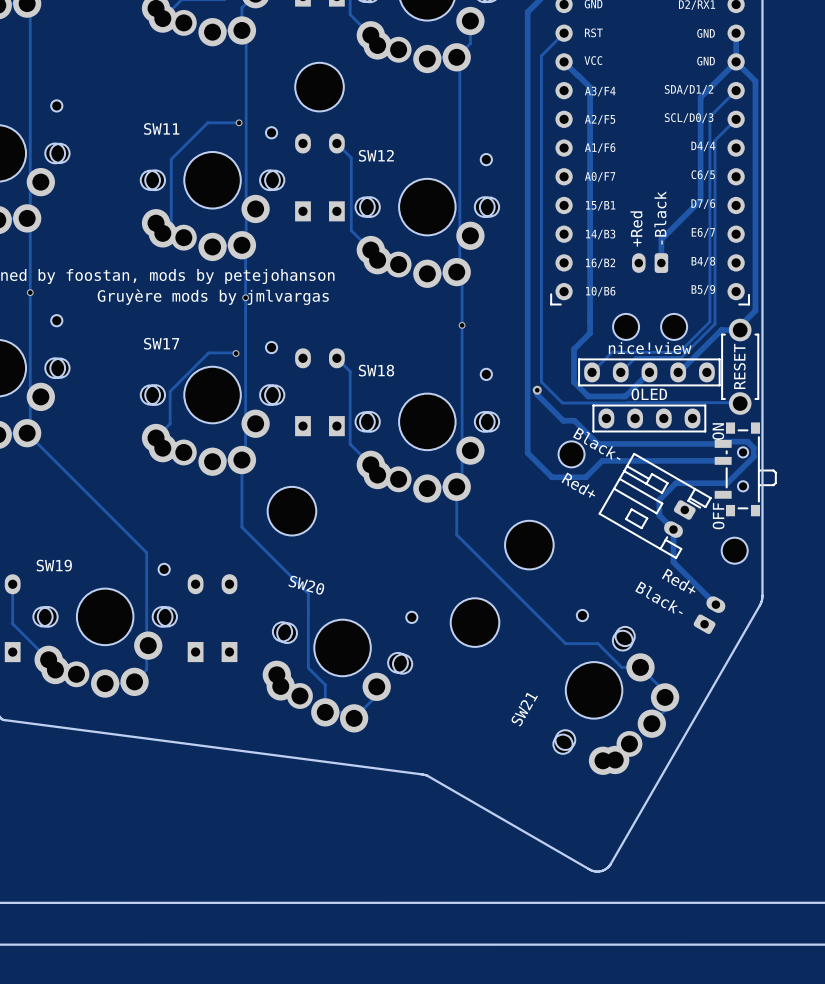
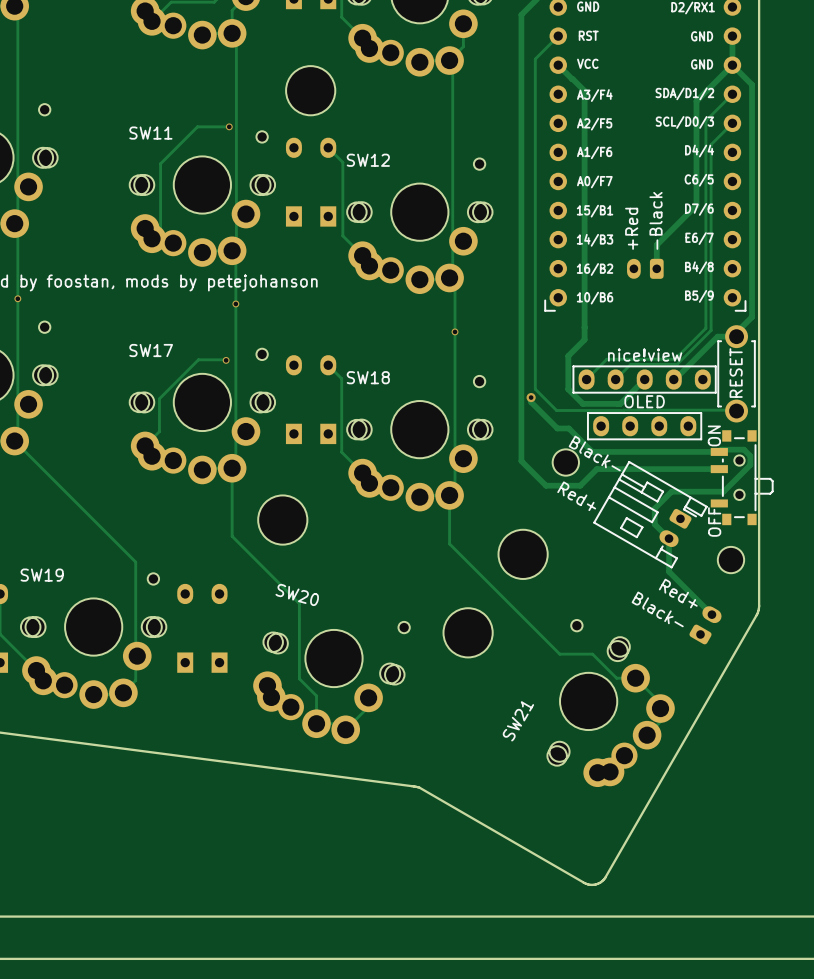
text: Gruyère mods by jmlvargas (213, 297) -> none
part: (626, 326) -> none
part: (674, 326) -> none

